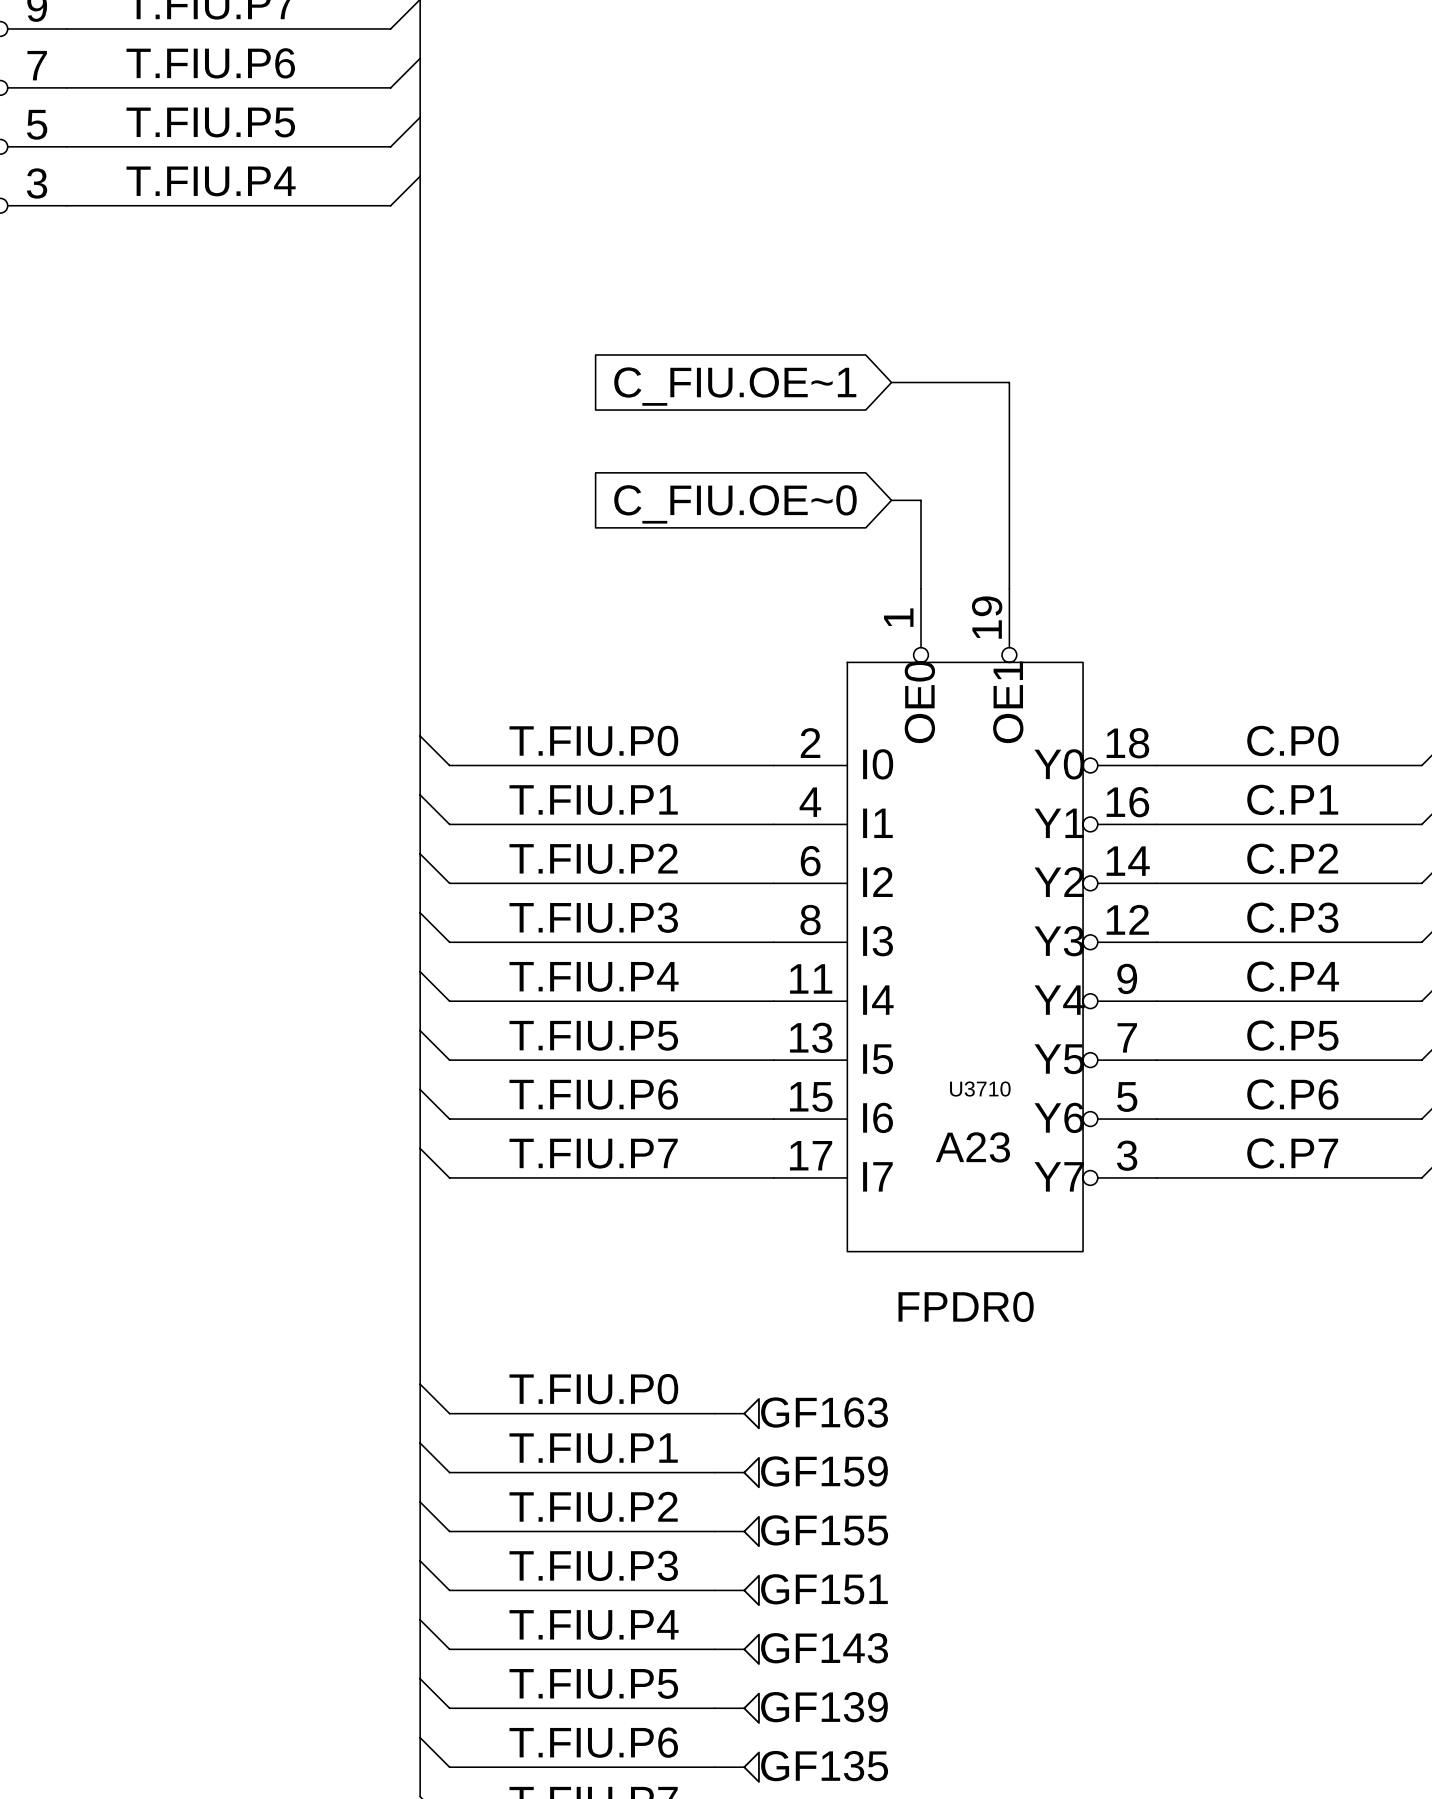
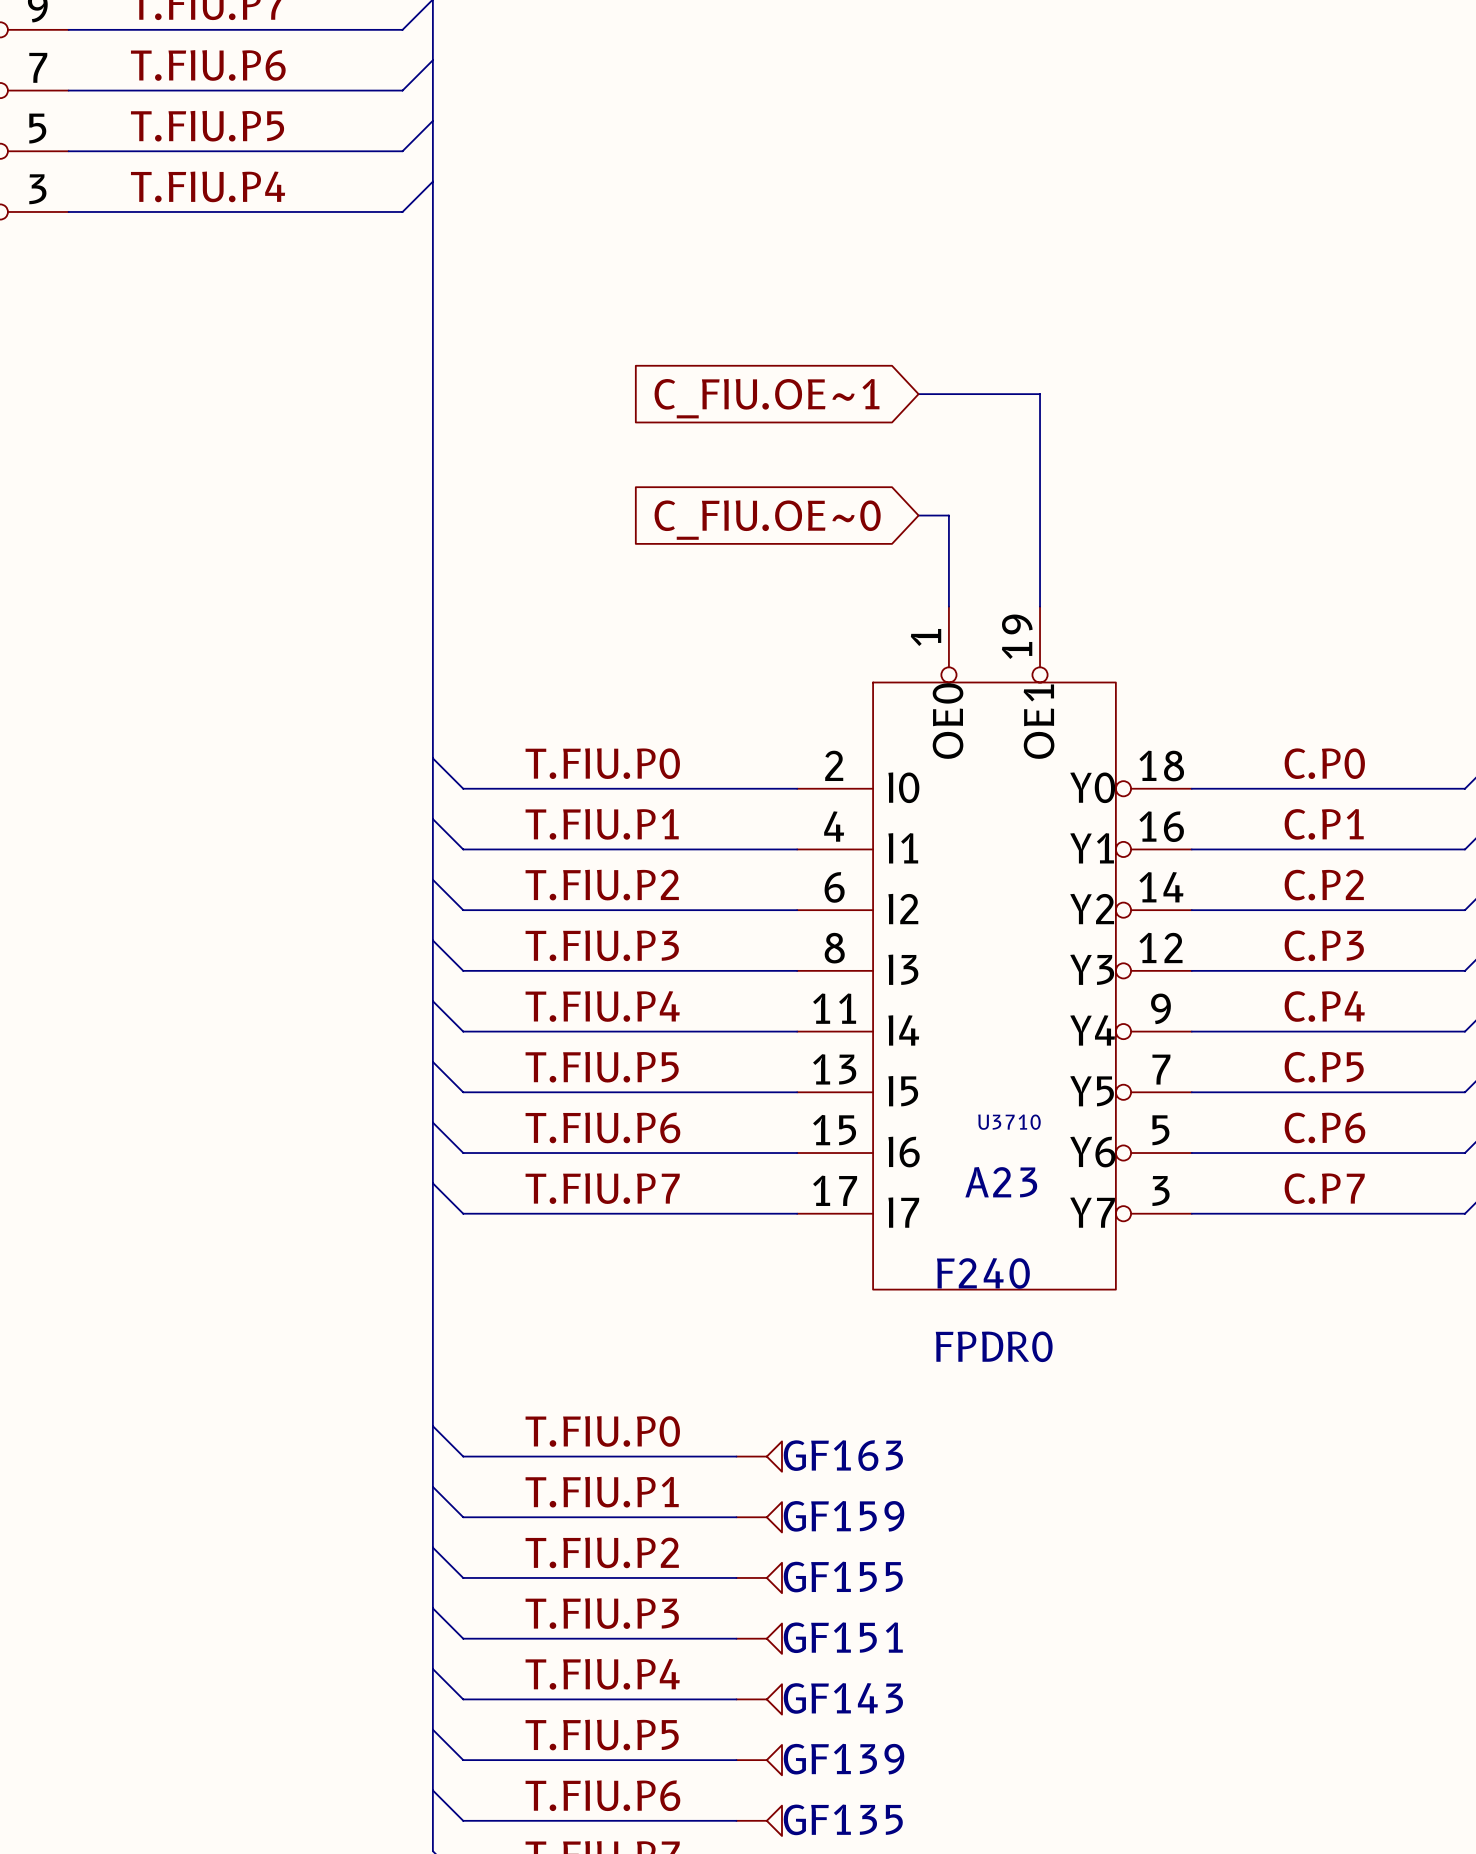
U3710 value: none -> F240 (983, 1273)

